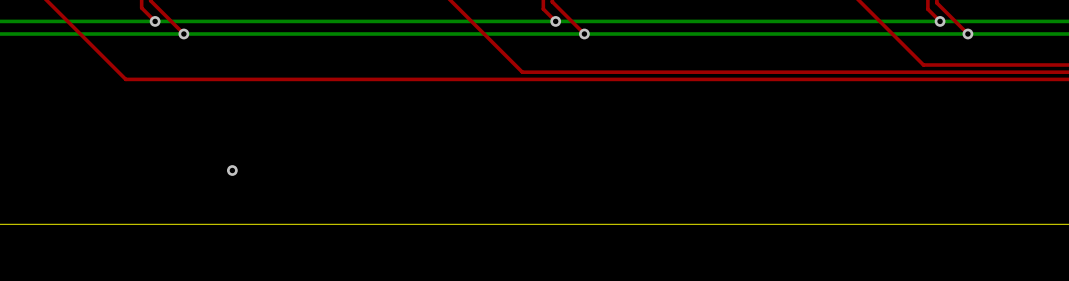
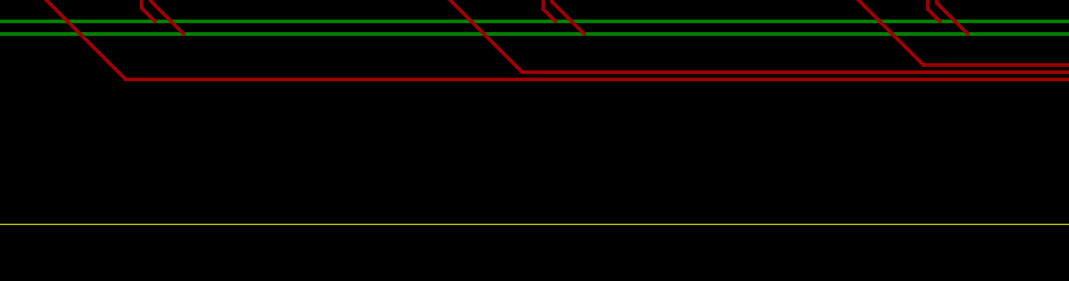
via: (155, 21) -> none
via: (555, 21) -> none
via: (940, 21) -> none
via: (183, 33) -> none
via: (584, 33) -> none
via: (967, 33) -> none
via: (232, 170) -> none

